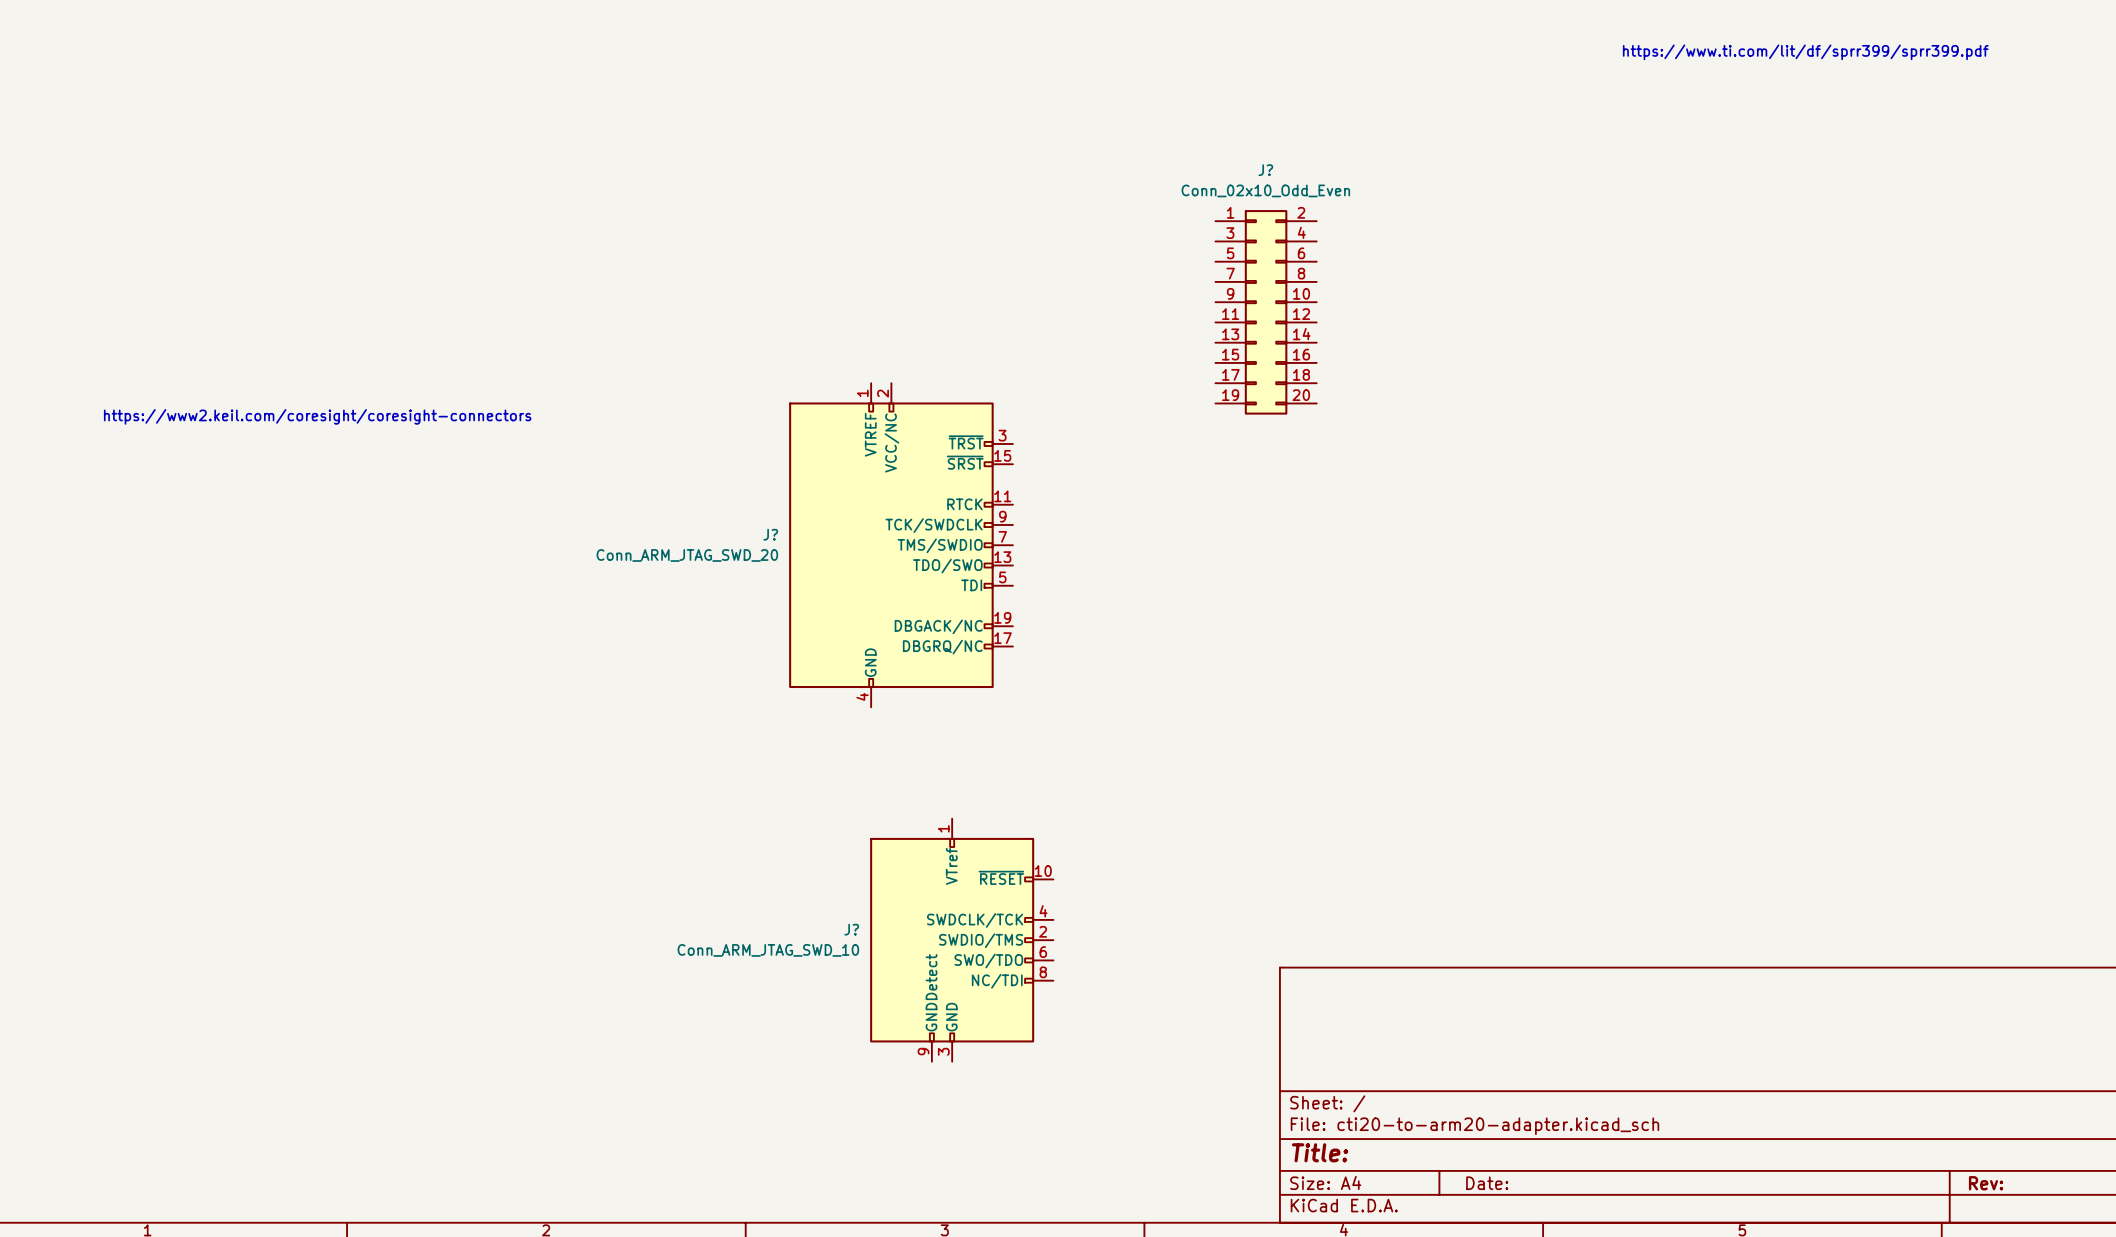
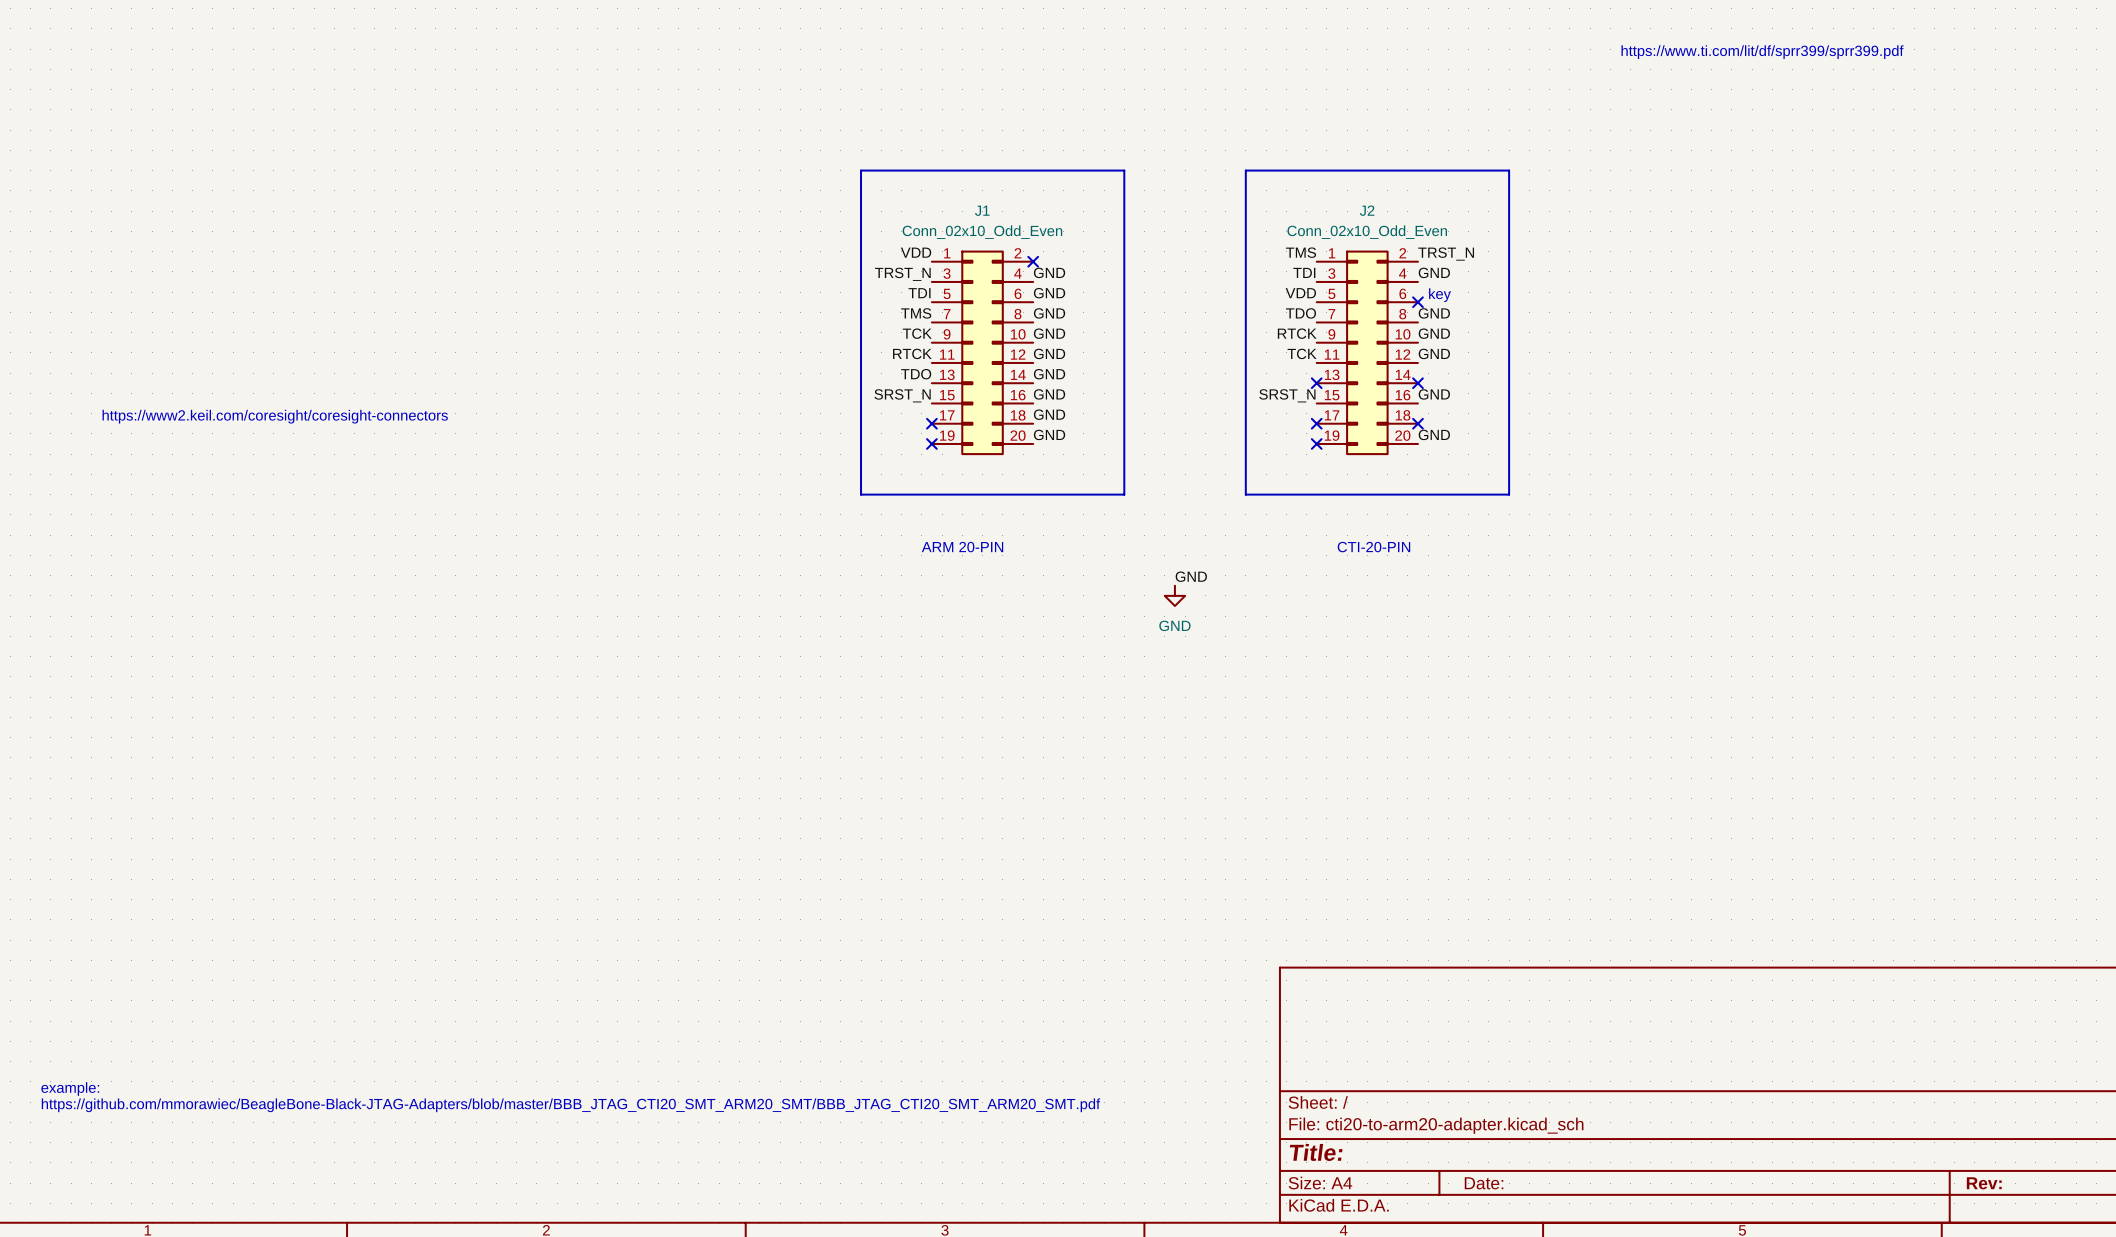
line: none -> (861, 170) (1124, 170) (1124, 494) (861, 494) (861, 170)
line: none -> (1245, 170) (1509, 170) (1509, 494) (1245, 494) (1245, 170)
label: none -> VDD (916, 252)
label: none -> TMS (1301, 252)
label: none -> TRST_N (1446, 254)
no-connect mark: none -> (1033, 261)
label: none -> GND (1049, 272)
label: none -> TDI (1304, 272)
label: none -> GND (1434, 272)
label: none -> TRST_N (902, 274)
label: none -> TDI (919, 293)
label: none -> GND (1049, 293)
label: none -> VDD (1300, 293)
text: none -> key (1440, 295)
no-connect mark: none -> (1417, 302)
J?: Conn_02x10_Odd_Even (1266, 312) -> none
label: none -> TMS (916, 313)
label: none -> GND (1049, 313)
label: none -> TDO (1300, 313)
label: none -> GND (1434, 313)
label: none -> TCK (917, 333)
label: none -> GND (1049, 333)
label: none -> RTCK (1297, 333)
label: none -> GND (1434, 333)
J1: none -> Conn_02x10_Odd_Even (982, 352)
J2: none -> Conn_02x10_Odd_Even (1367, 352)
label: none -> RTCK (912, 353)
label: none -> GND (1049, 353)
label: none -> TCK (1302, 353)
label: none -> GND (1434, 353)
label: none -> TDO (916, 374)
label: none -> GND (1049, 374)
no-connect mark: none -> (1316, 383)
no-connect mark: none -> (1417, 383)
label: none -> SRST_N (902, 395)
label: none -> GND (1049, 394)
label: none -> SRST_N (1287, 395)
label: none -> GND (1434, 394)
label: none -> GND (1049, 414)
no-connect mark: none -> (931, 423)
no-connect mark: none -> (1316, 423)
no-connect mark: none -> (1417, 423)
label: none -> GND (1049, 434)
label: none -> GND (1434, 434)
no-connect mark: none -> (931, 443)
no-connect mark: none -> (1316, 443)
J?: Conn_ARM_JTAG_SWD_20 (901, 545) -> none
text: none -> ARM 20-PIN (962, 547)
text: none -> CTI-20-PIN (1373, 547)
label: none -> GND (1191, 576)
power symbol: none -> GND (1174, 595)
J?: Conn_ARM_JTAG_SWD_10 (961, 940) -> none
text: none -> example: (70, 1088)
text: none -> https://github.com/mmorawiec/BeagleBone-Black-JTAG-Adapters/blob/master/BBB_JTAG_CTI20_SMT_ARM20_SMT/BBB_JTAG_CTI20_SMT_ARM20_SMT.pdf (570, 1105)

